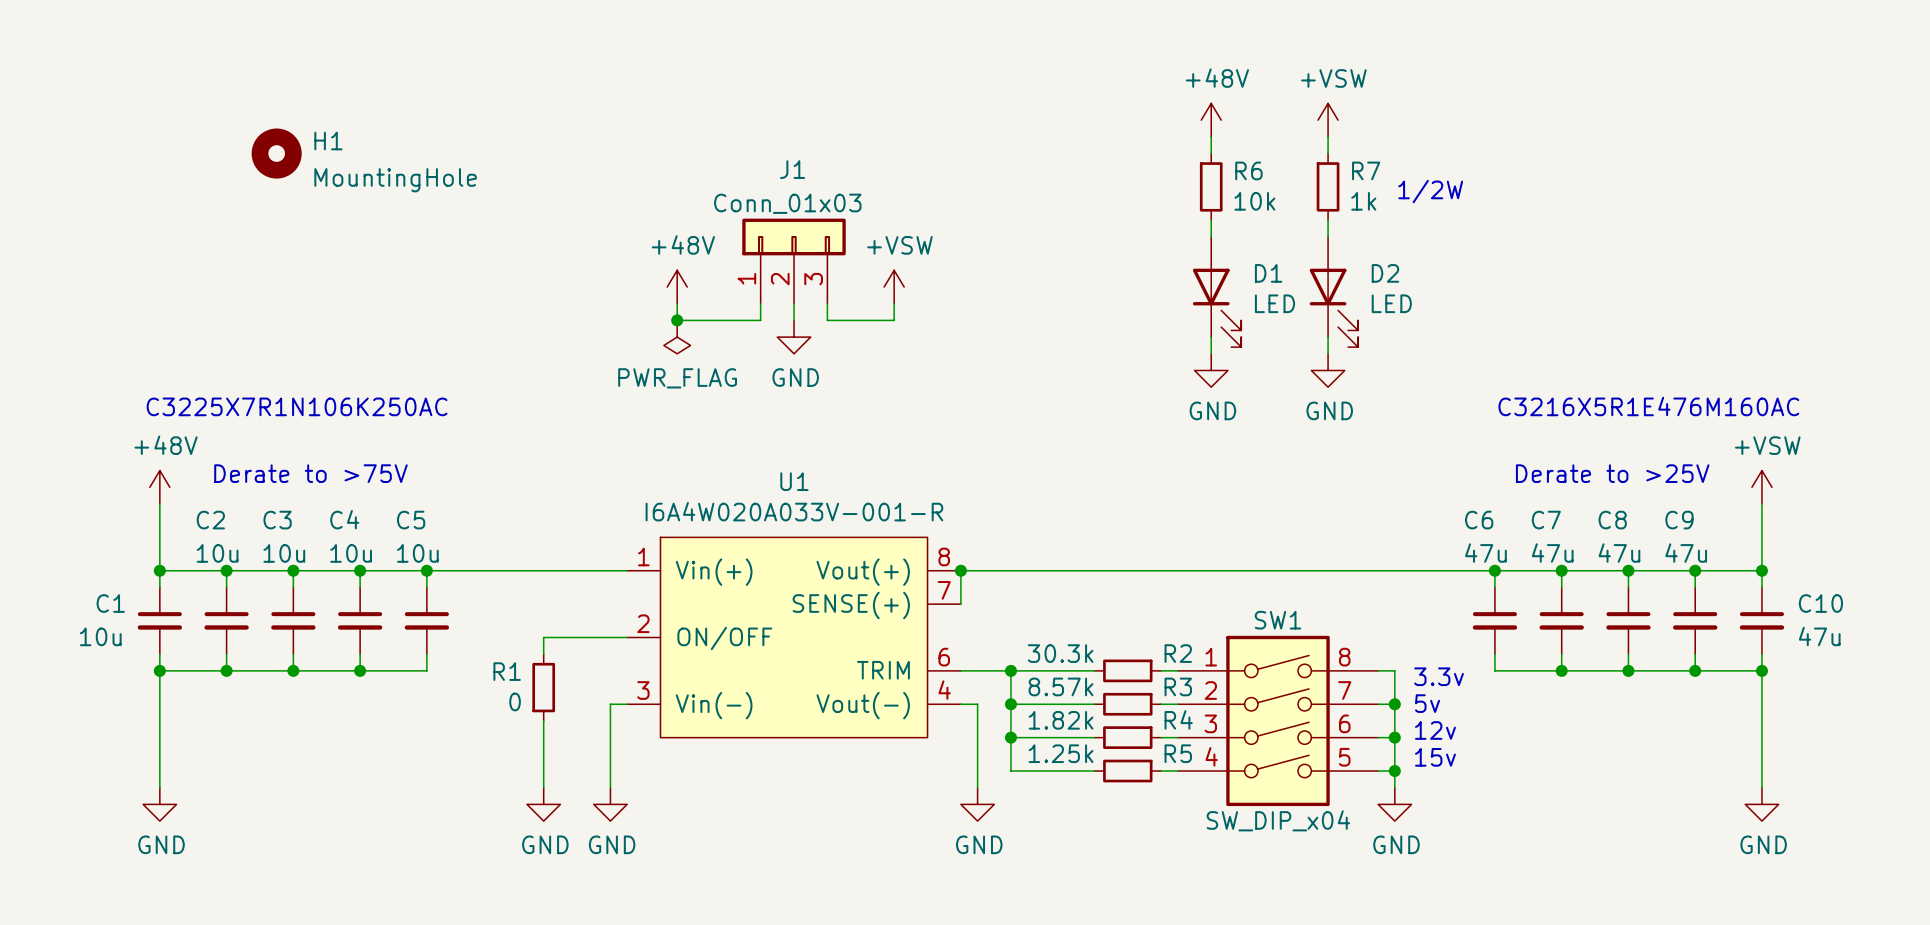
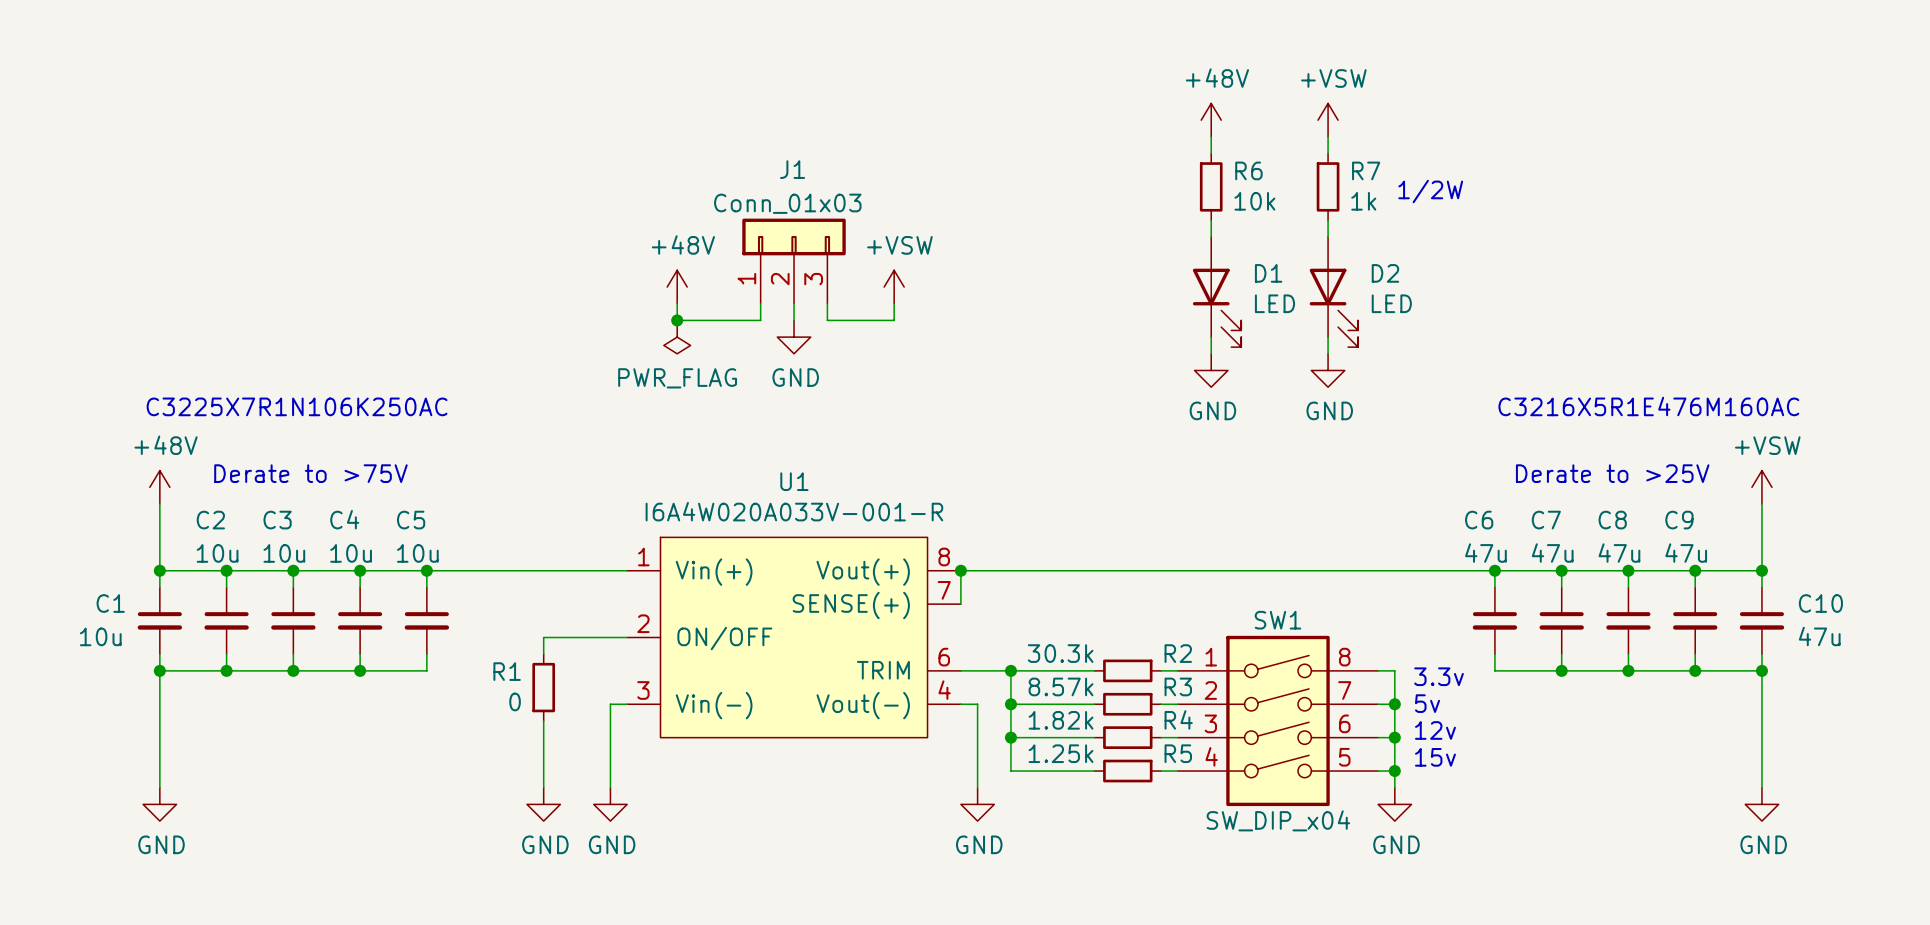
H1: MountingHole (276, 153) -> none

